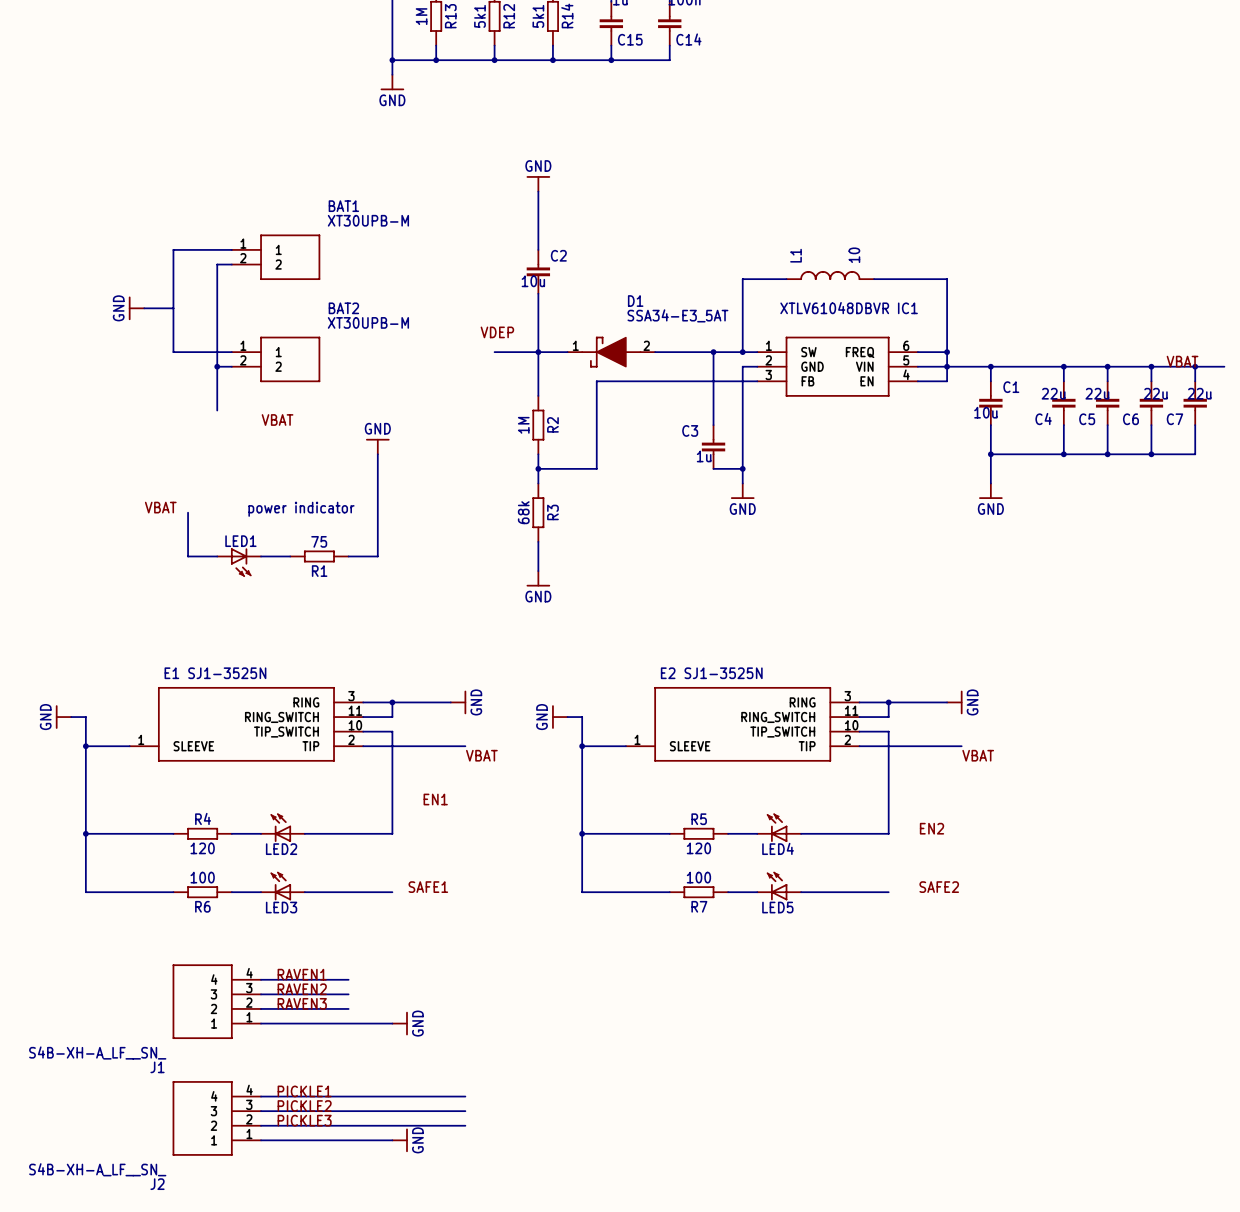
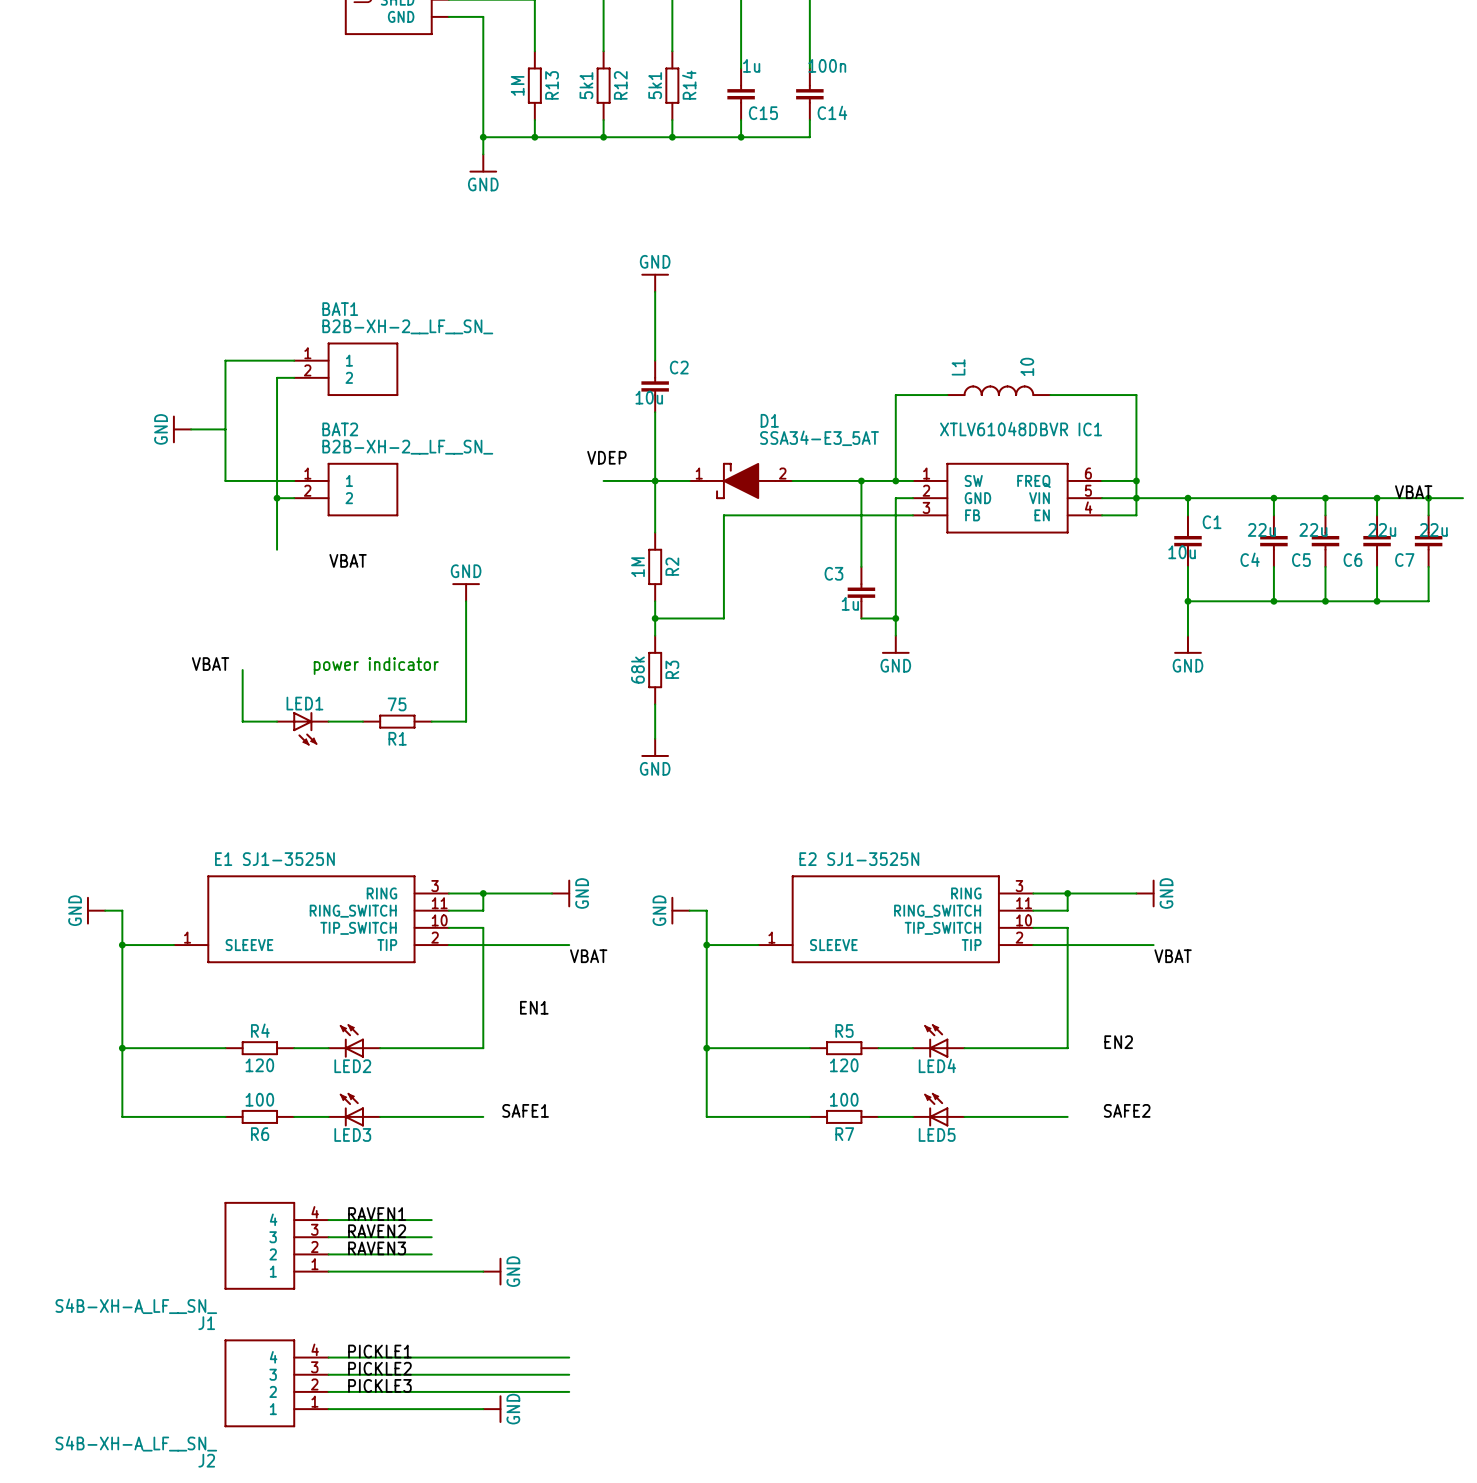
BAT1 name position: BAT1 (343, 206) -> BAT1 (340, 309)
BAT1 value: XT30UPB-M (368, 220) -> B2B-XH-2__LF__SN_ (407, 326)
BAT2 name position: BAT2 (343, 308) -> BAT2 (340, 429)
BAT2 value: XT30UPB-M (368, 322) -> B2B-XH-2__LF__SN_ (407, 447)

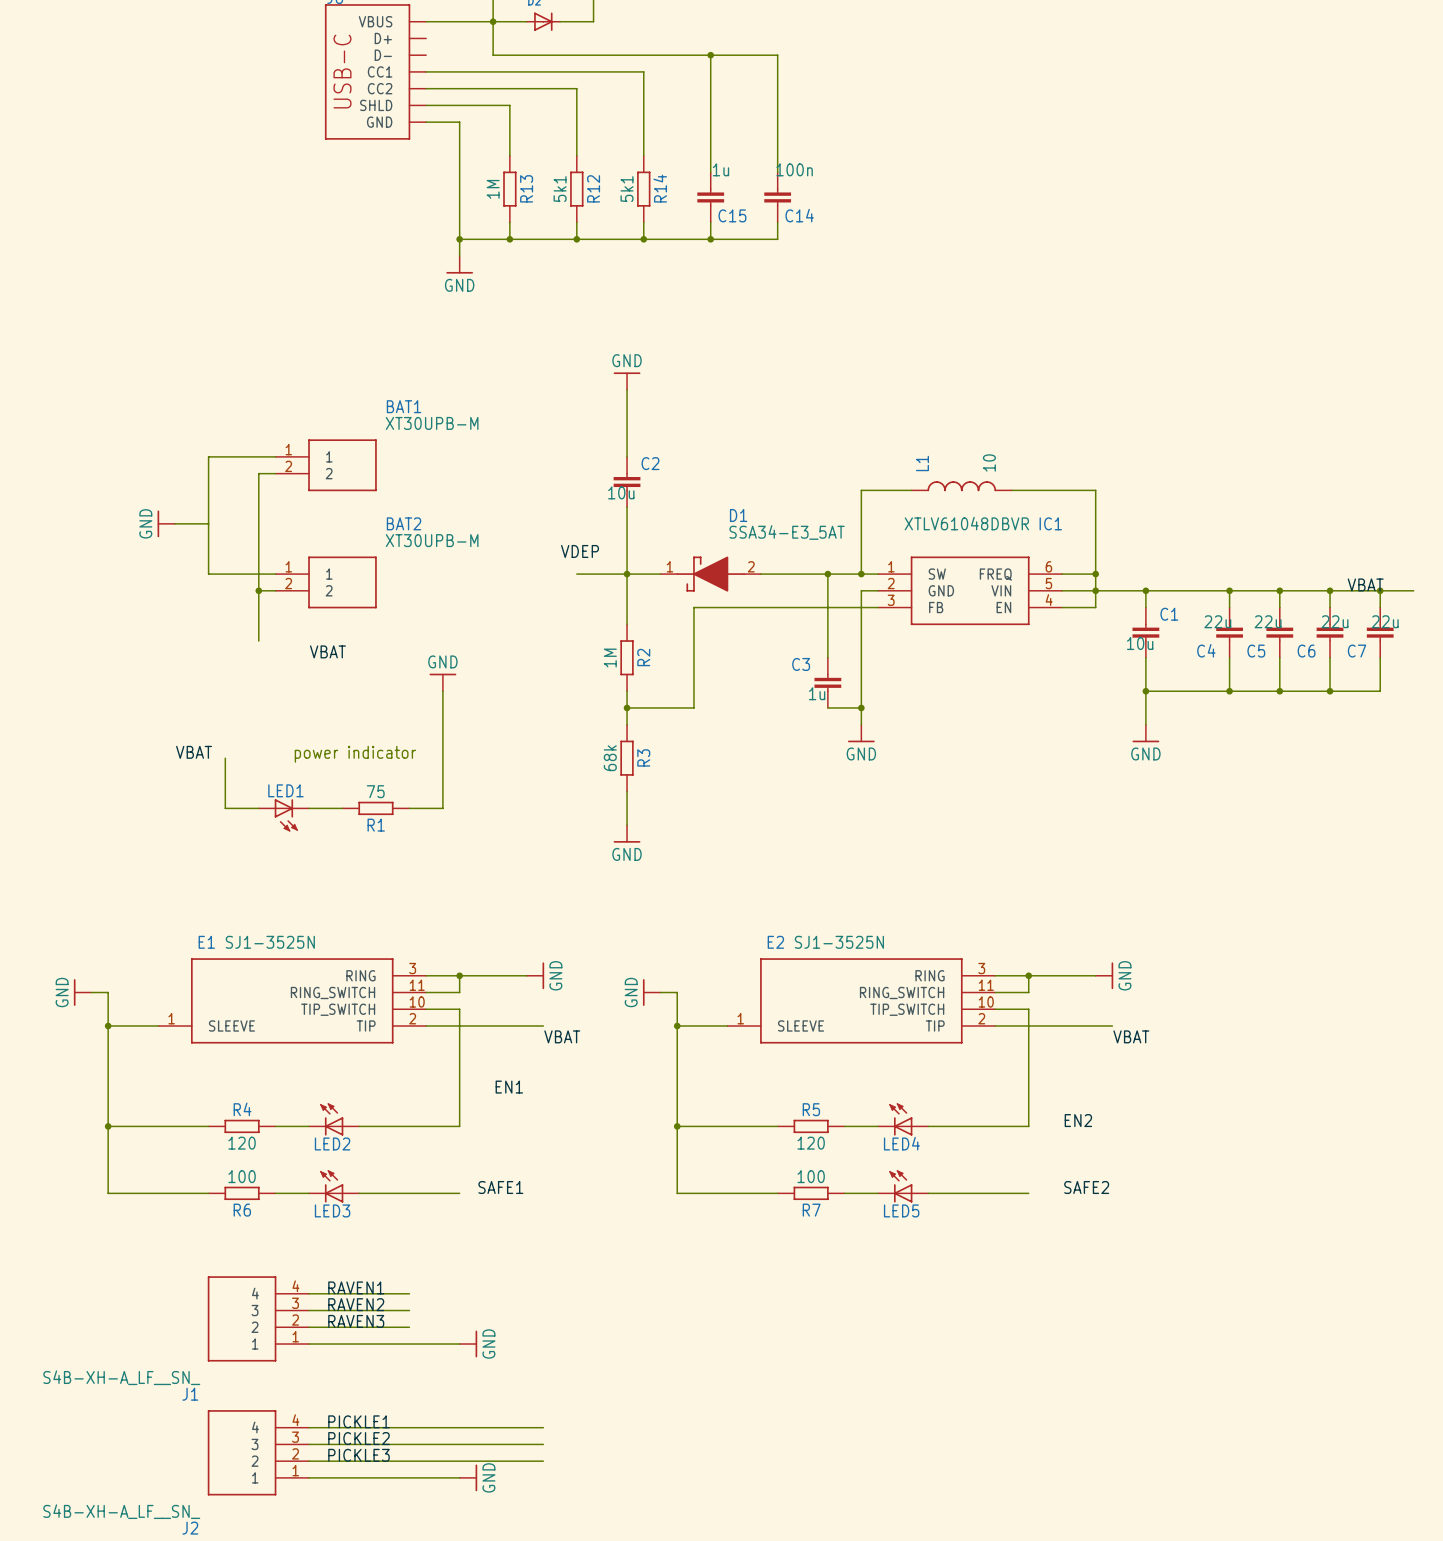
BAT1 name position: BAT1 (340, 309) -> BAT1 (404, 406)
BAT1 value: B2B-XH-2__LF__SN_ (407, 326) -> XT30UPB-M (432, 423)
BAT2 name position: BAT2 (340, 429) -> BAT2 (404, 523)
BAT2 value: B2B-XH-2__LF__SN_ (407, 447) -> XT30UPB-M (432, 540)

